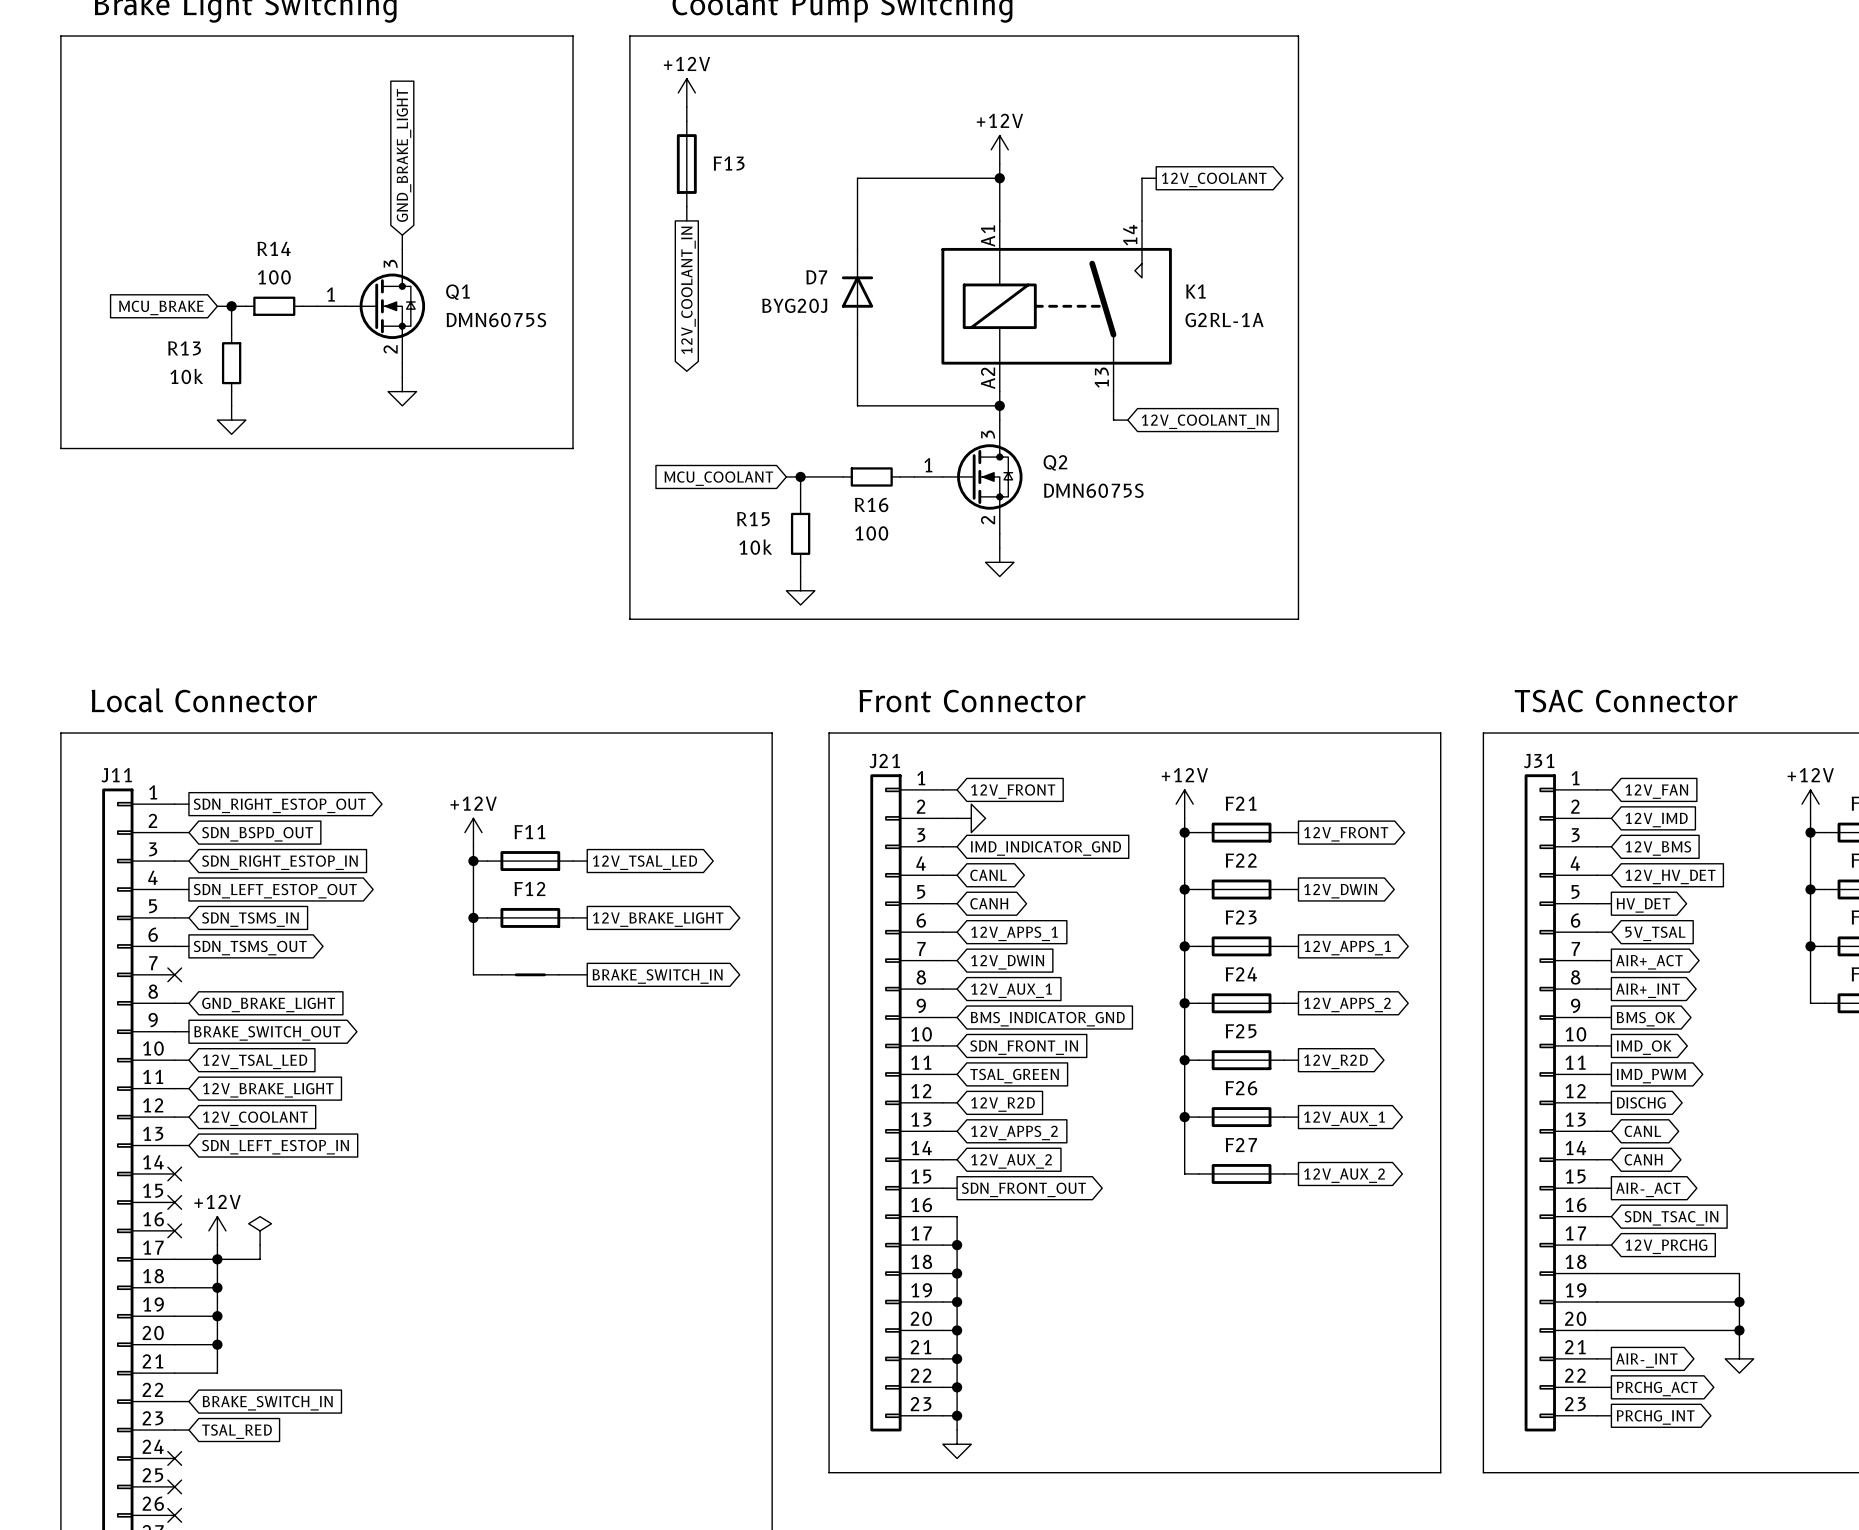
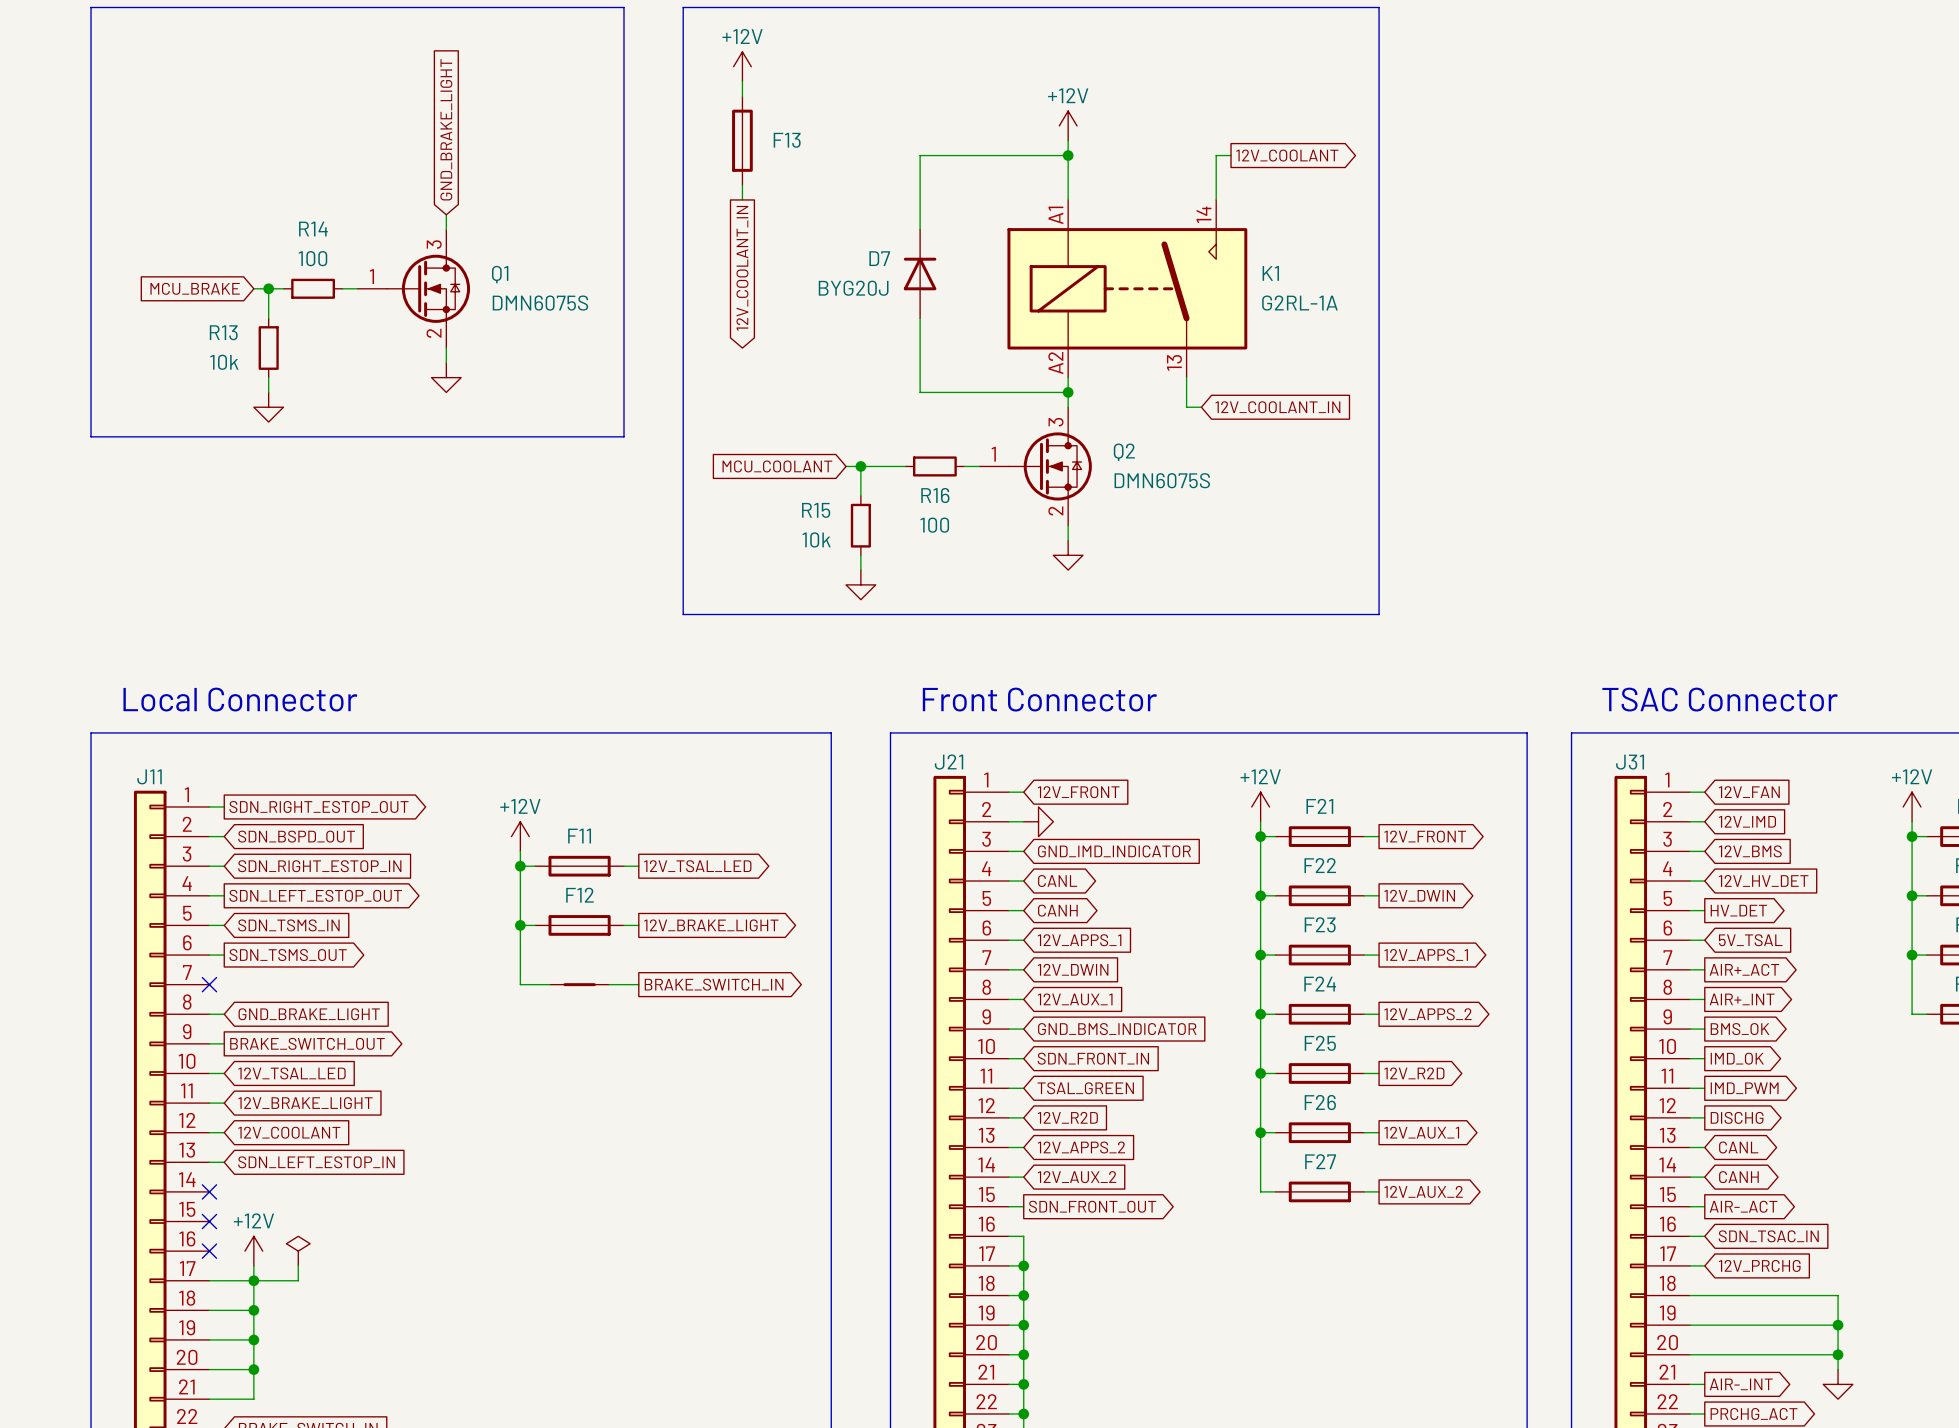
global label: IMD_INDICATOR_GND (1045, 848) -> GND_IMD_INDICATOR (1114, 851)
global label: BMS_INDICATOR_GND (1047, 1019) -> GND_BMS_INDICATOR (1117, 1029)

